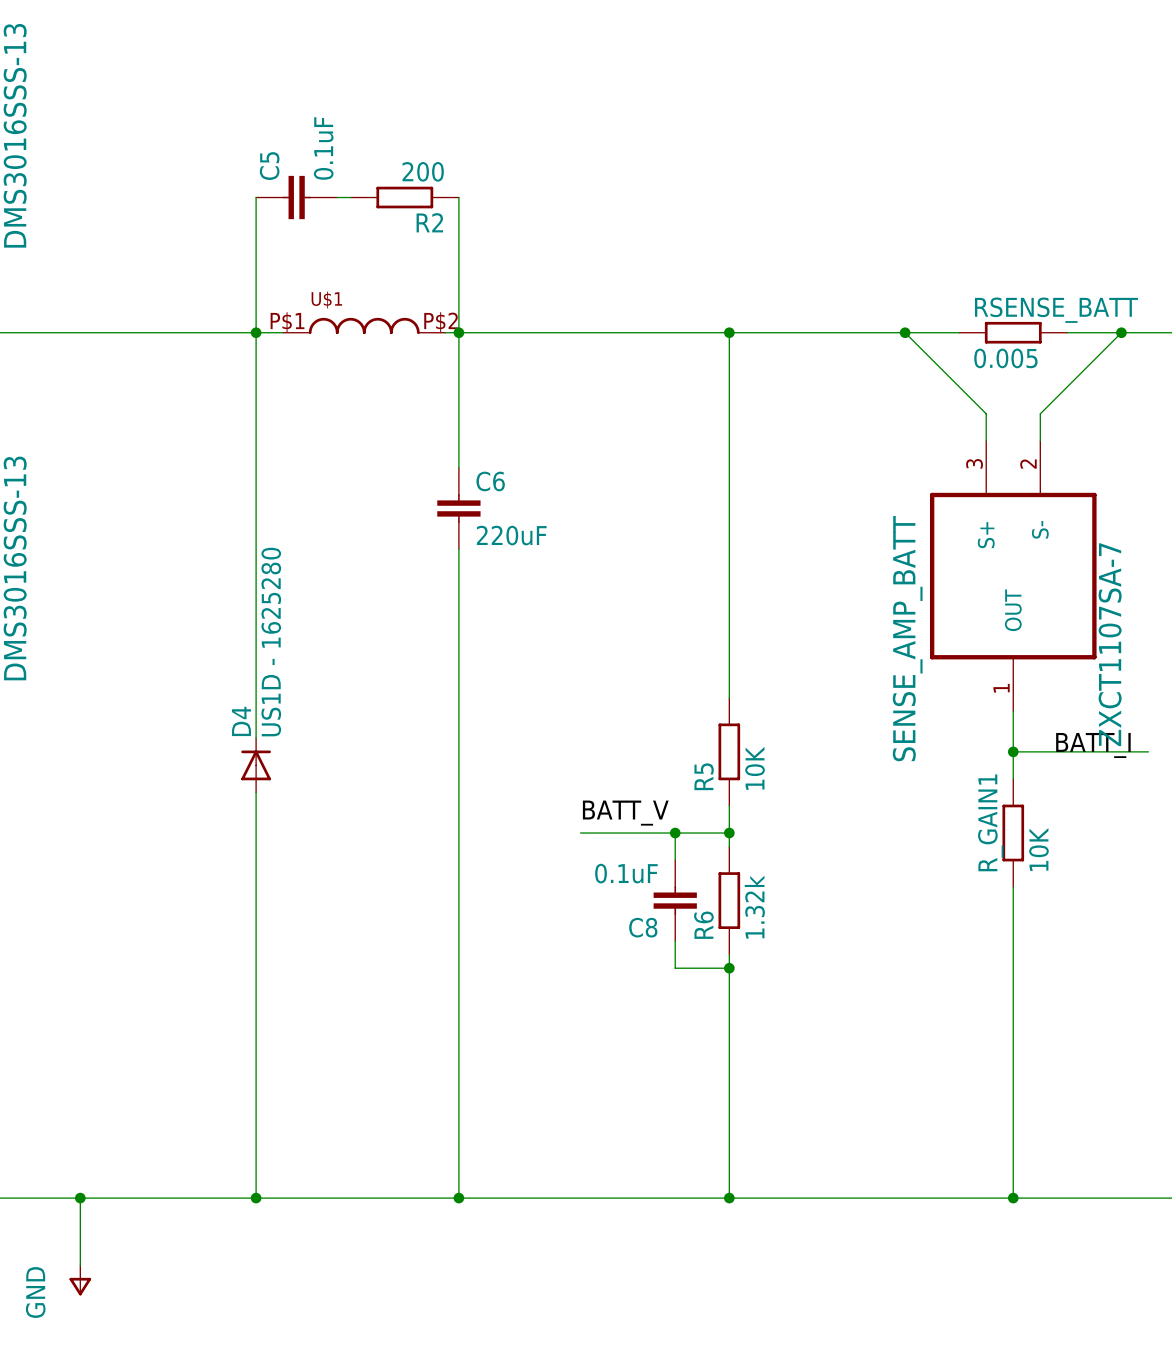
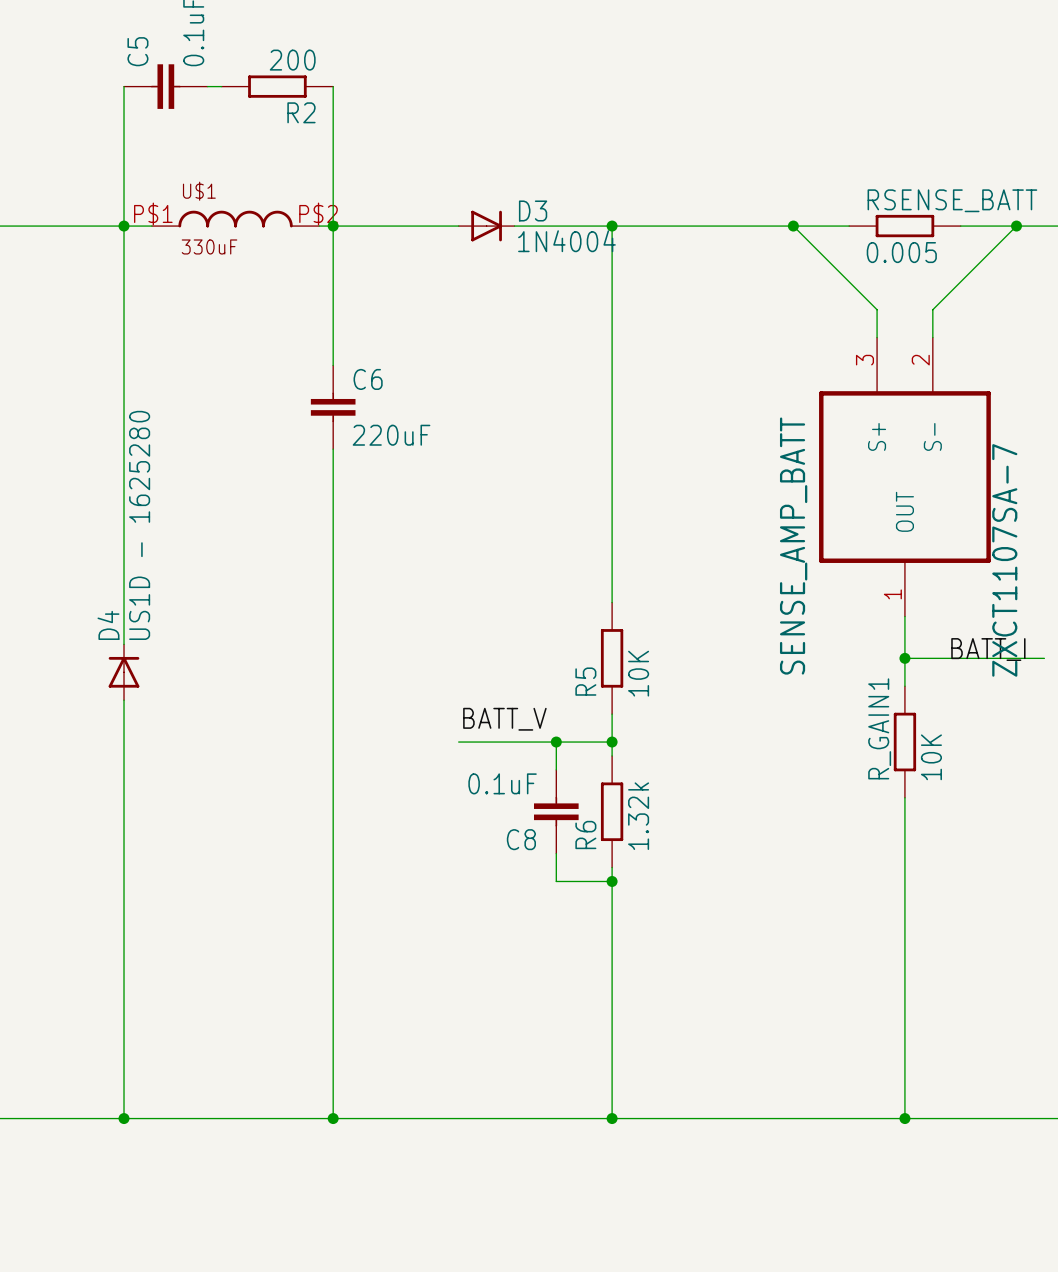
D3: none -> 1N4004 (486, 226)
U$1 value: none -> 330uF (209, 246)

